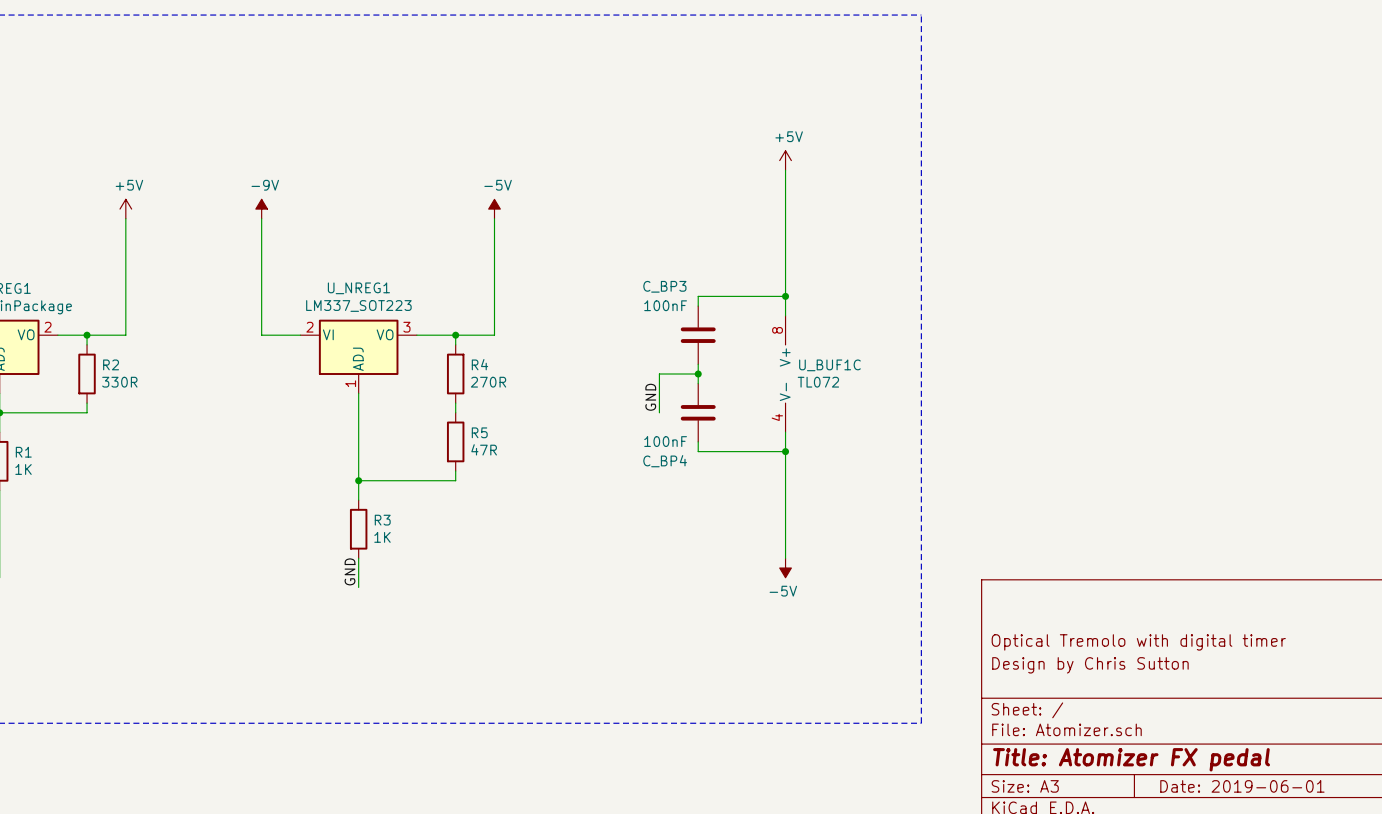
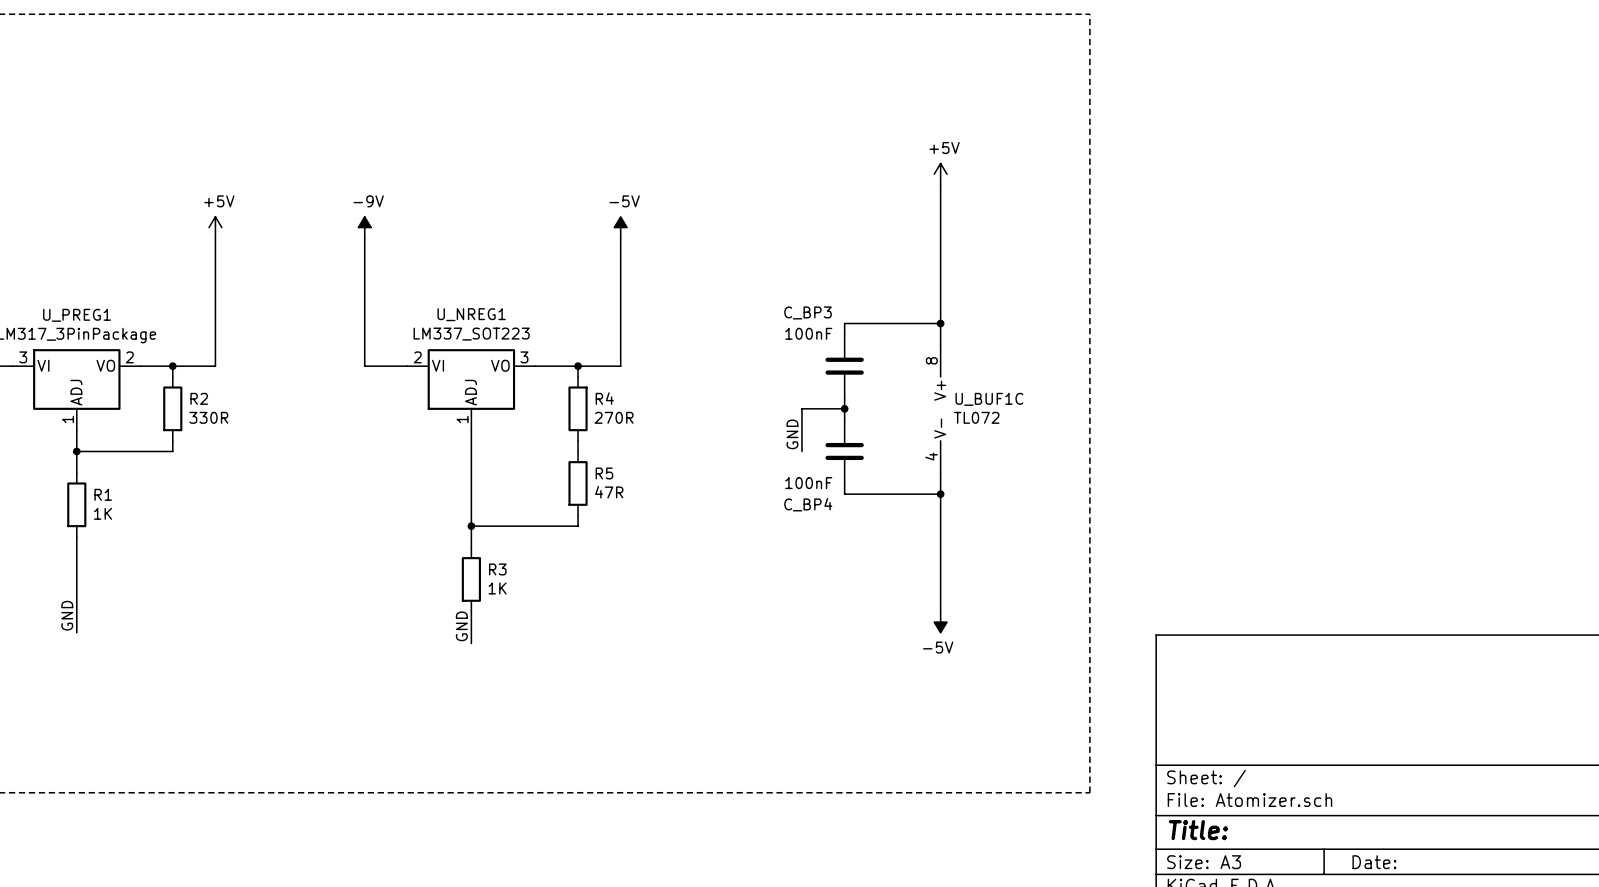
title block: Optical Tremolo with digital timer (1138, 642) -> none
title block: Design by Chris Sutton (1090, 665) -> none
title block: Title: Atomizer FX pedal (1131, 759) -> Title: (1198, 830)
title block: Date: 2019-06-01 (1242, 786) -> Date: (1374, 862)

